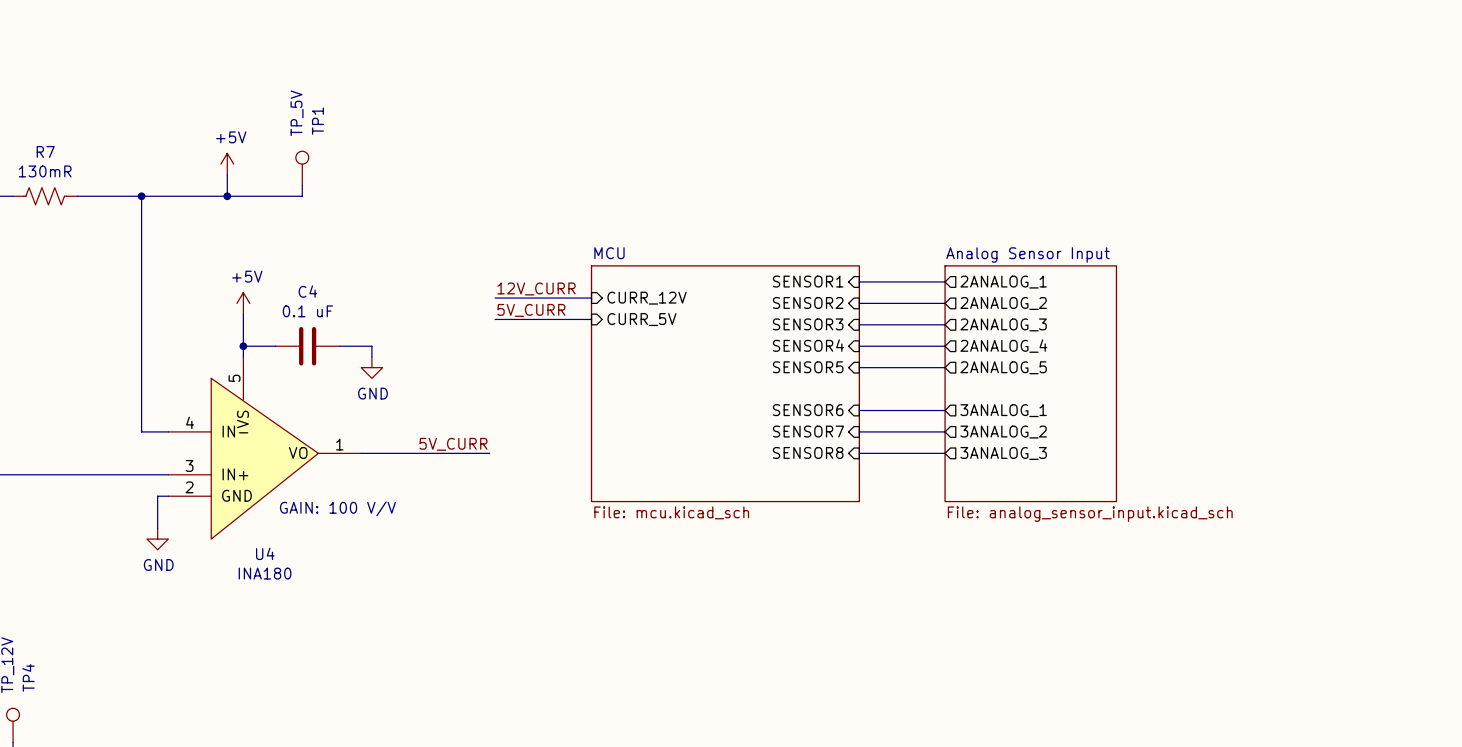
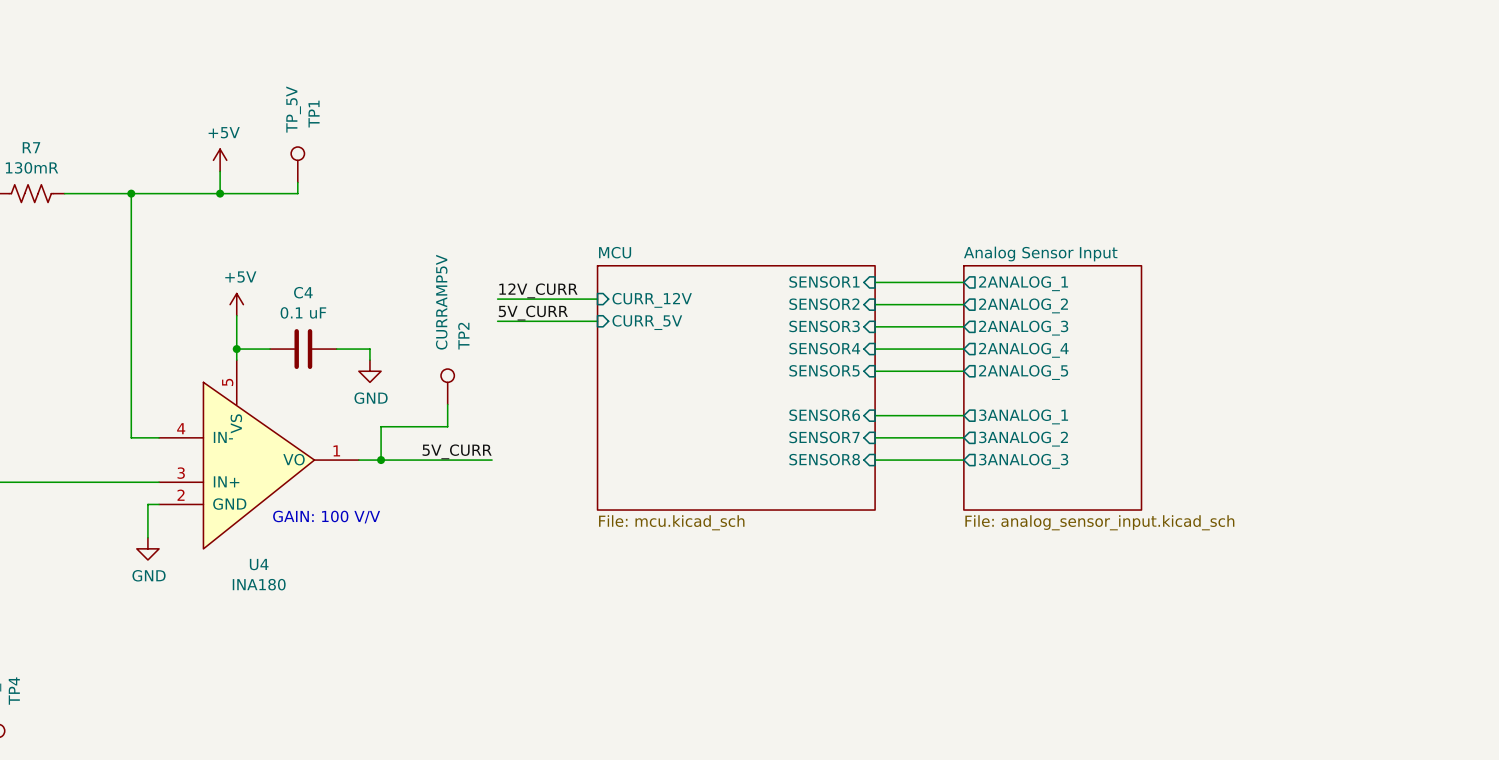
TP2: none -> CURRAMP5V (447, 386)
wire: none -> (447, 404) (447, 426) (381, 426) (381, 460)
junction: none -> (381, 460)

